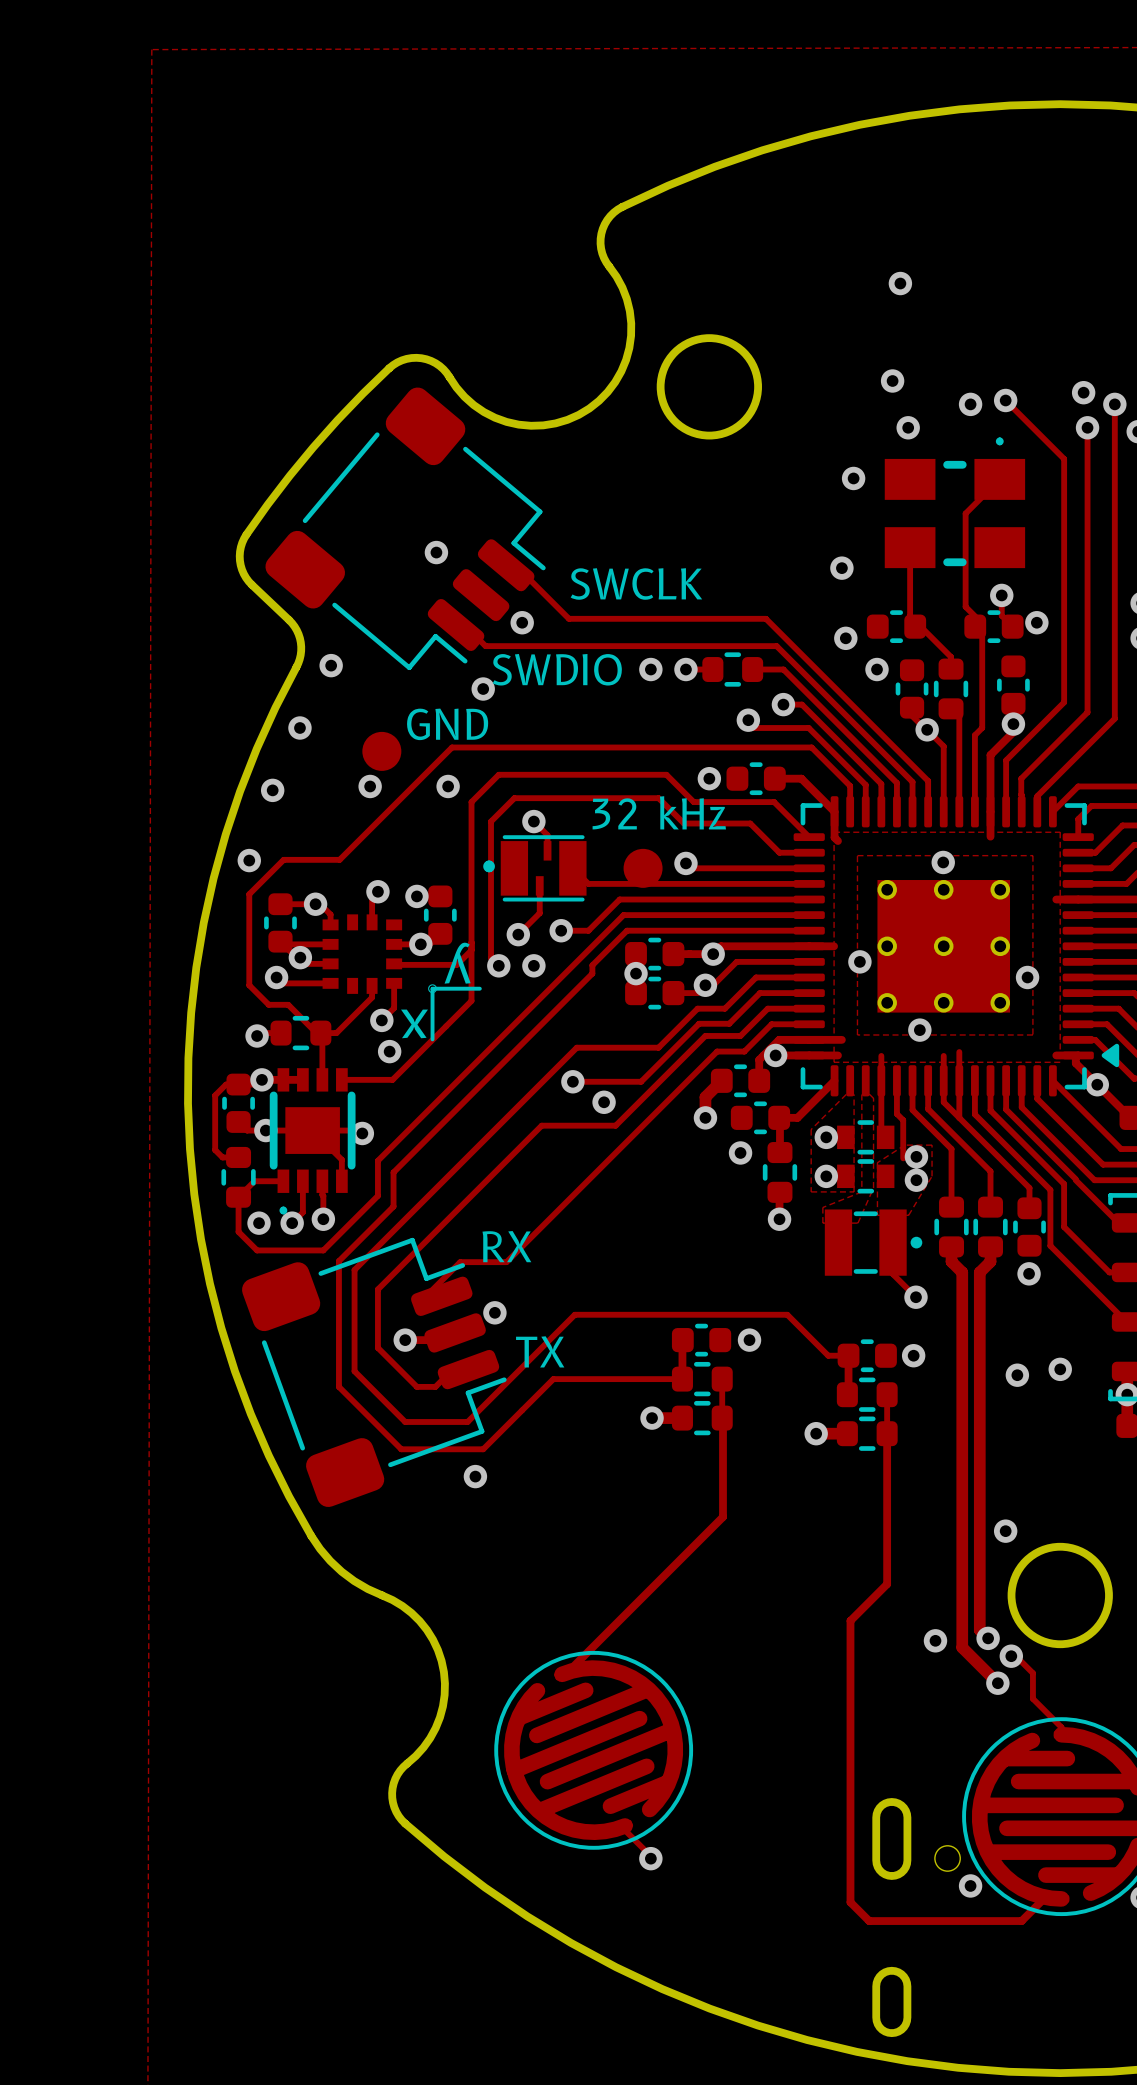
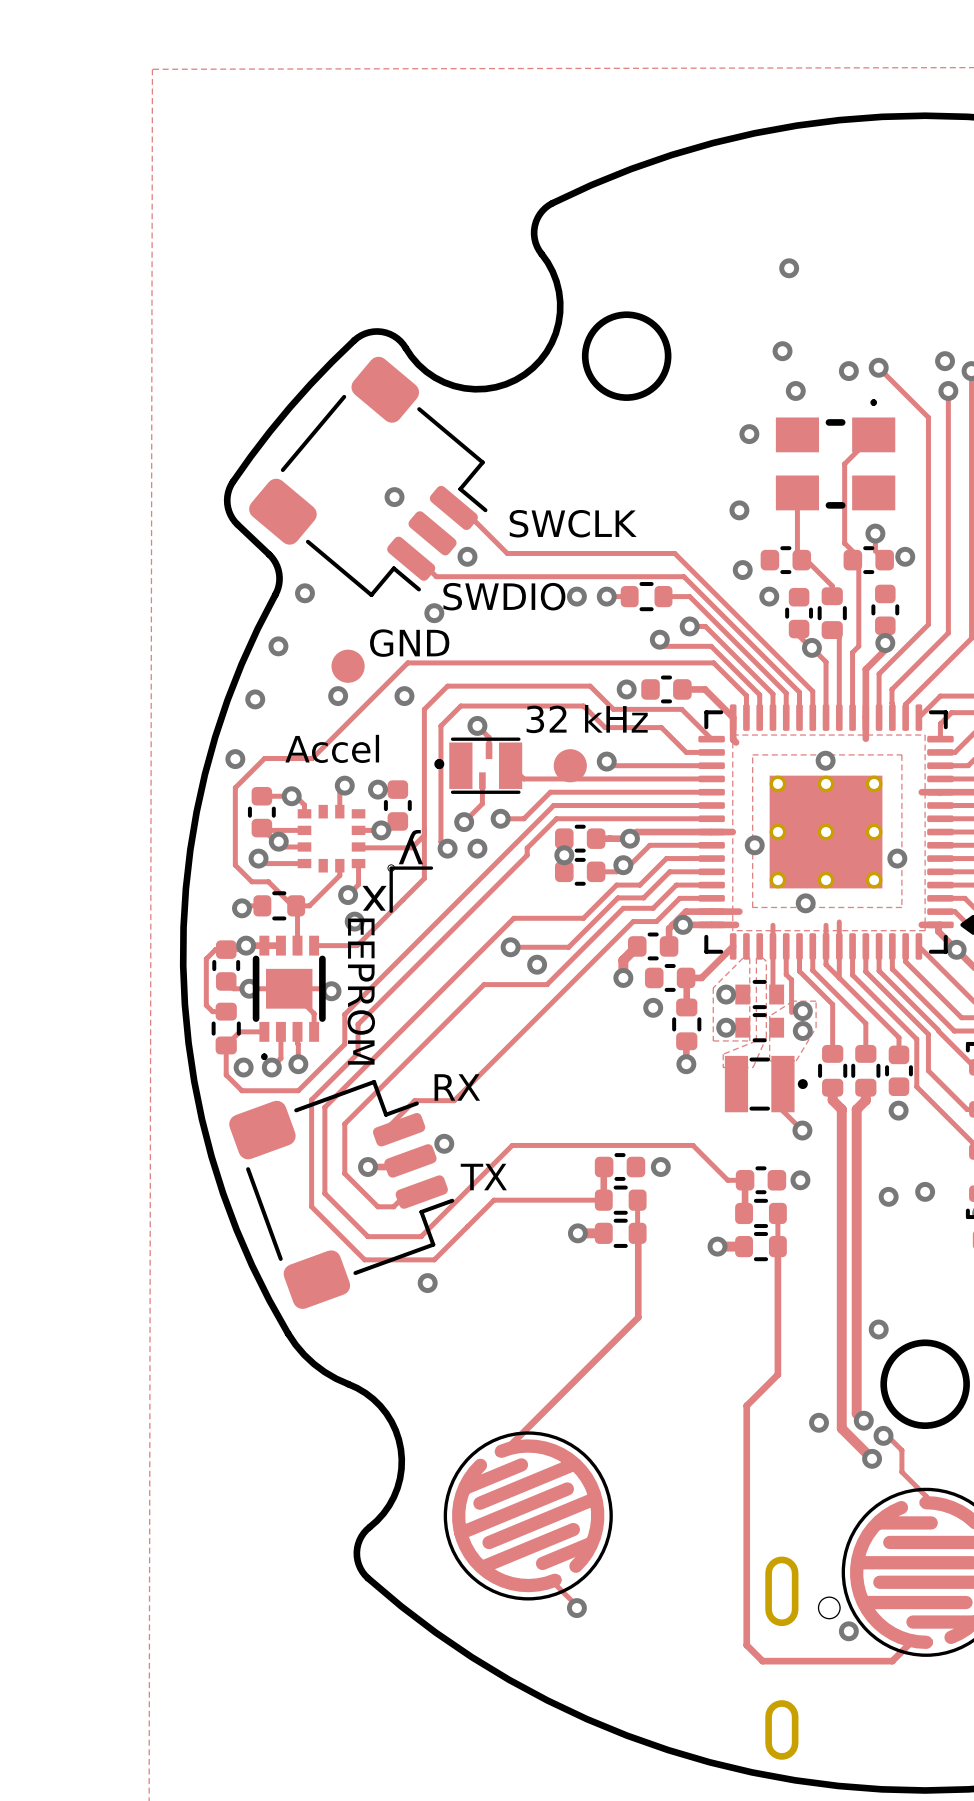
text: none -> Accel (332, 748)
text: none -> EEPROM (361, 991)

